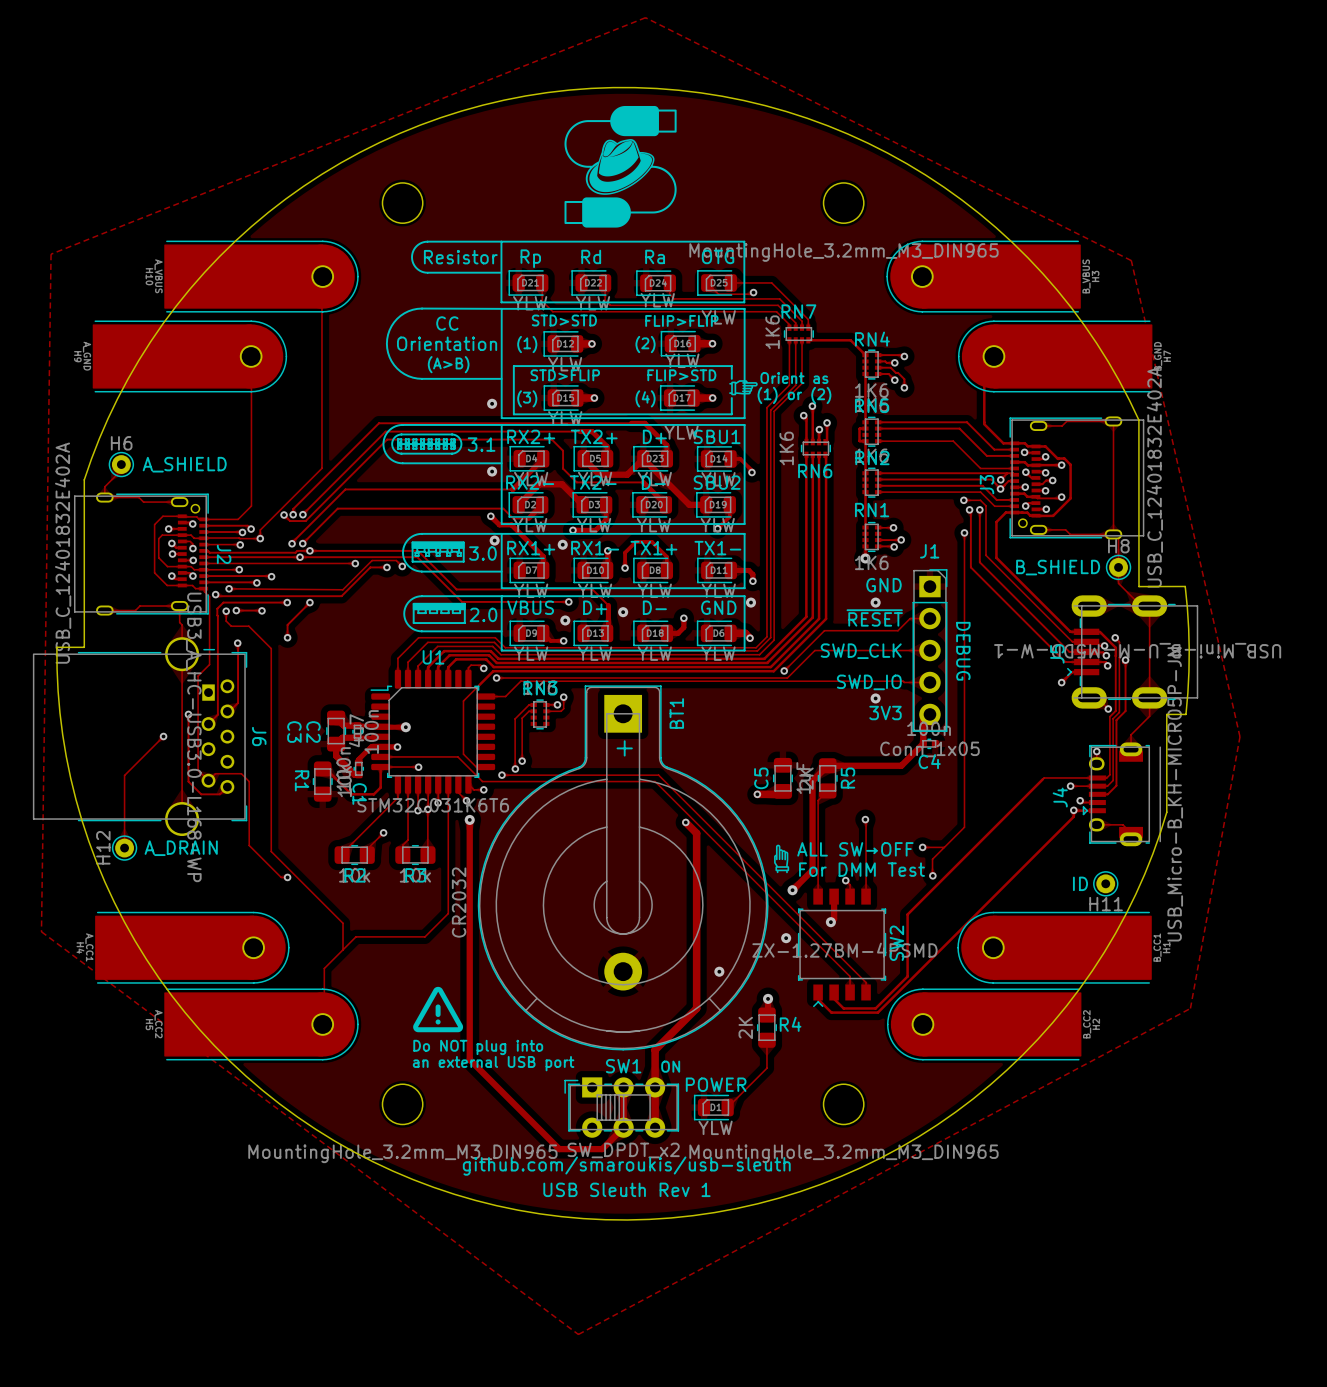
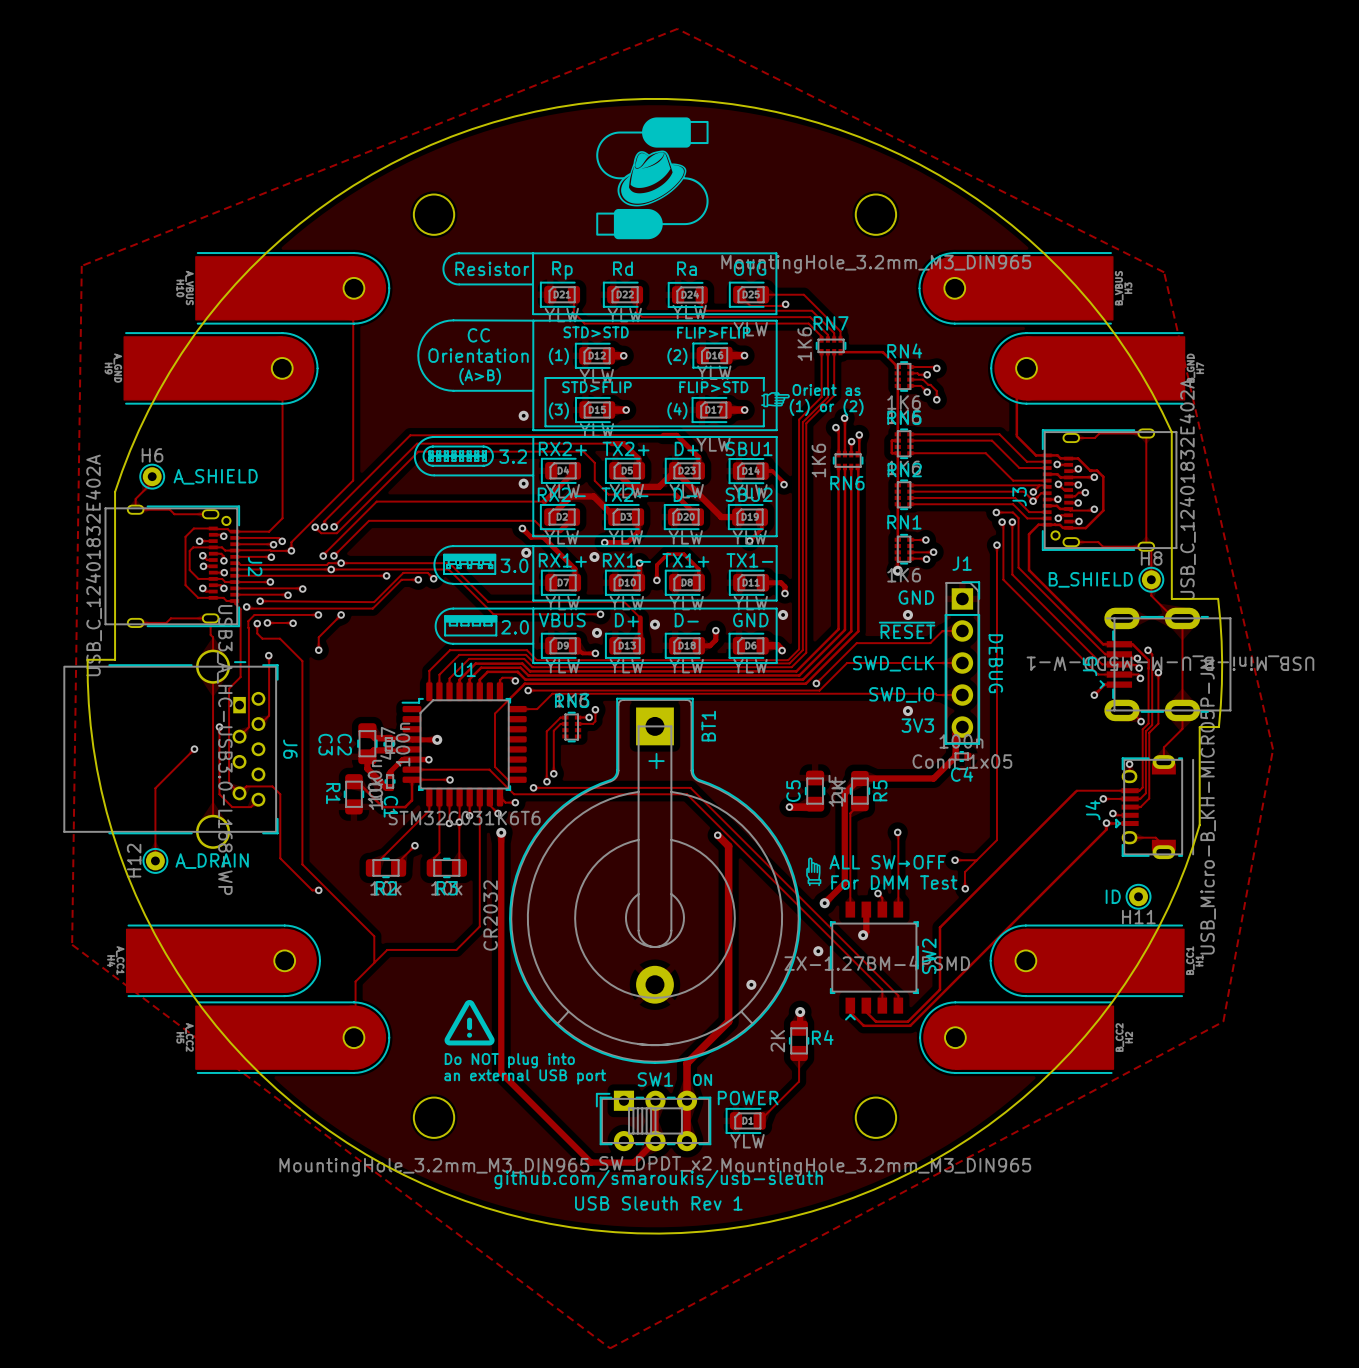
text: 3.1 (481, 444) -> 3.2 (513, 456)

